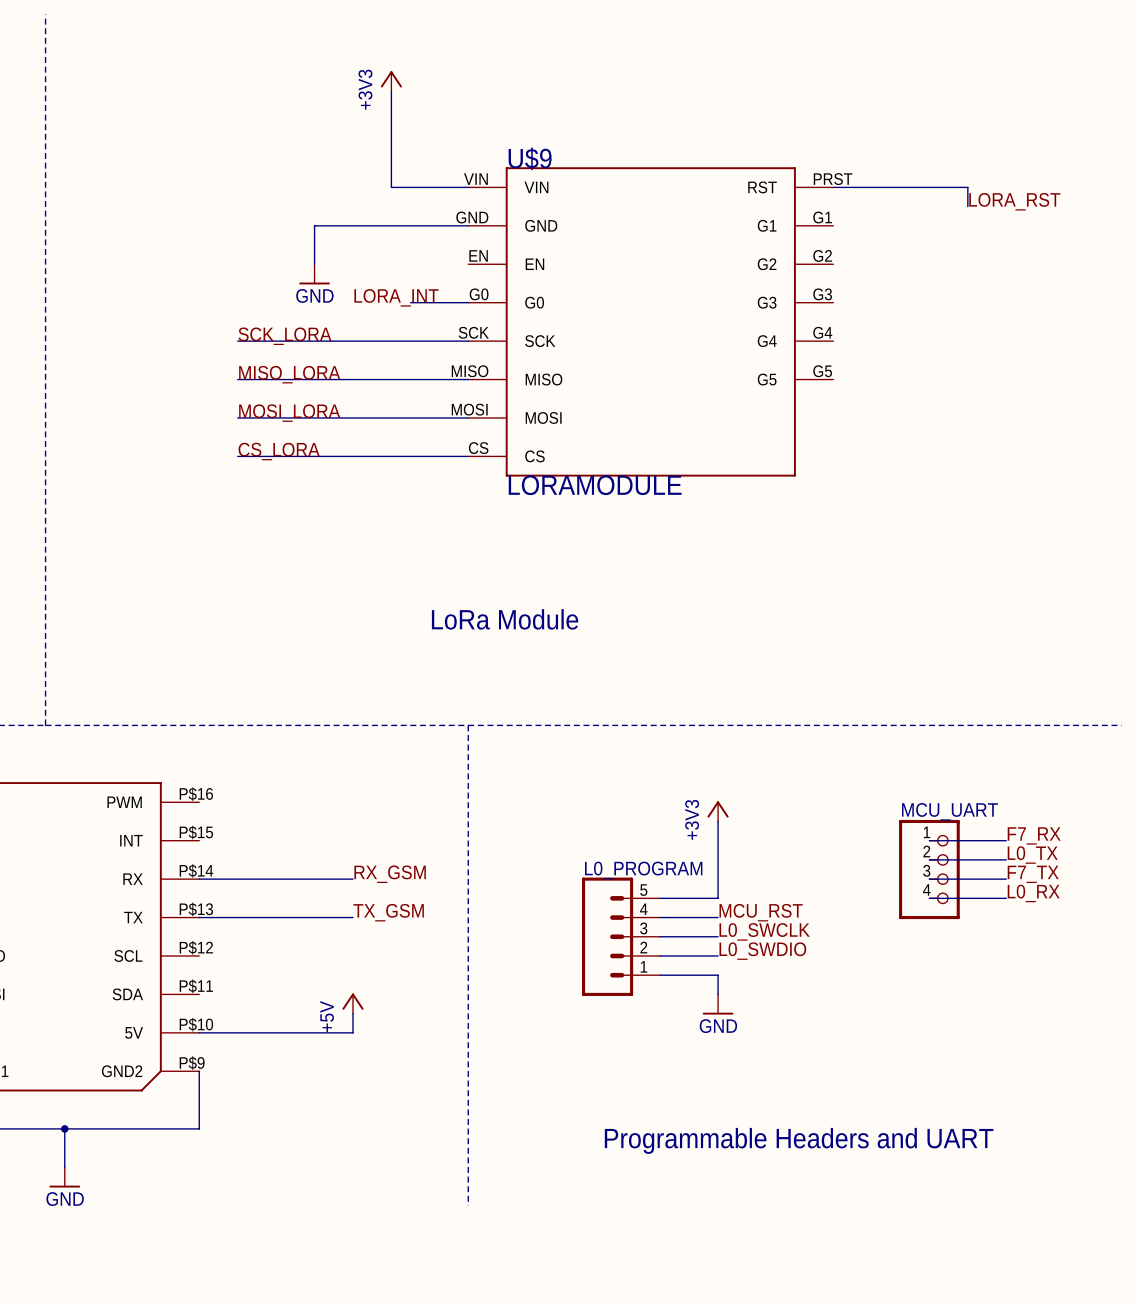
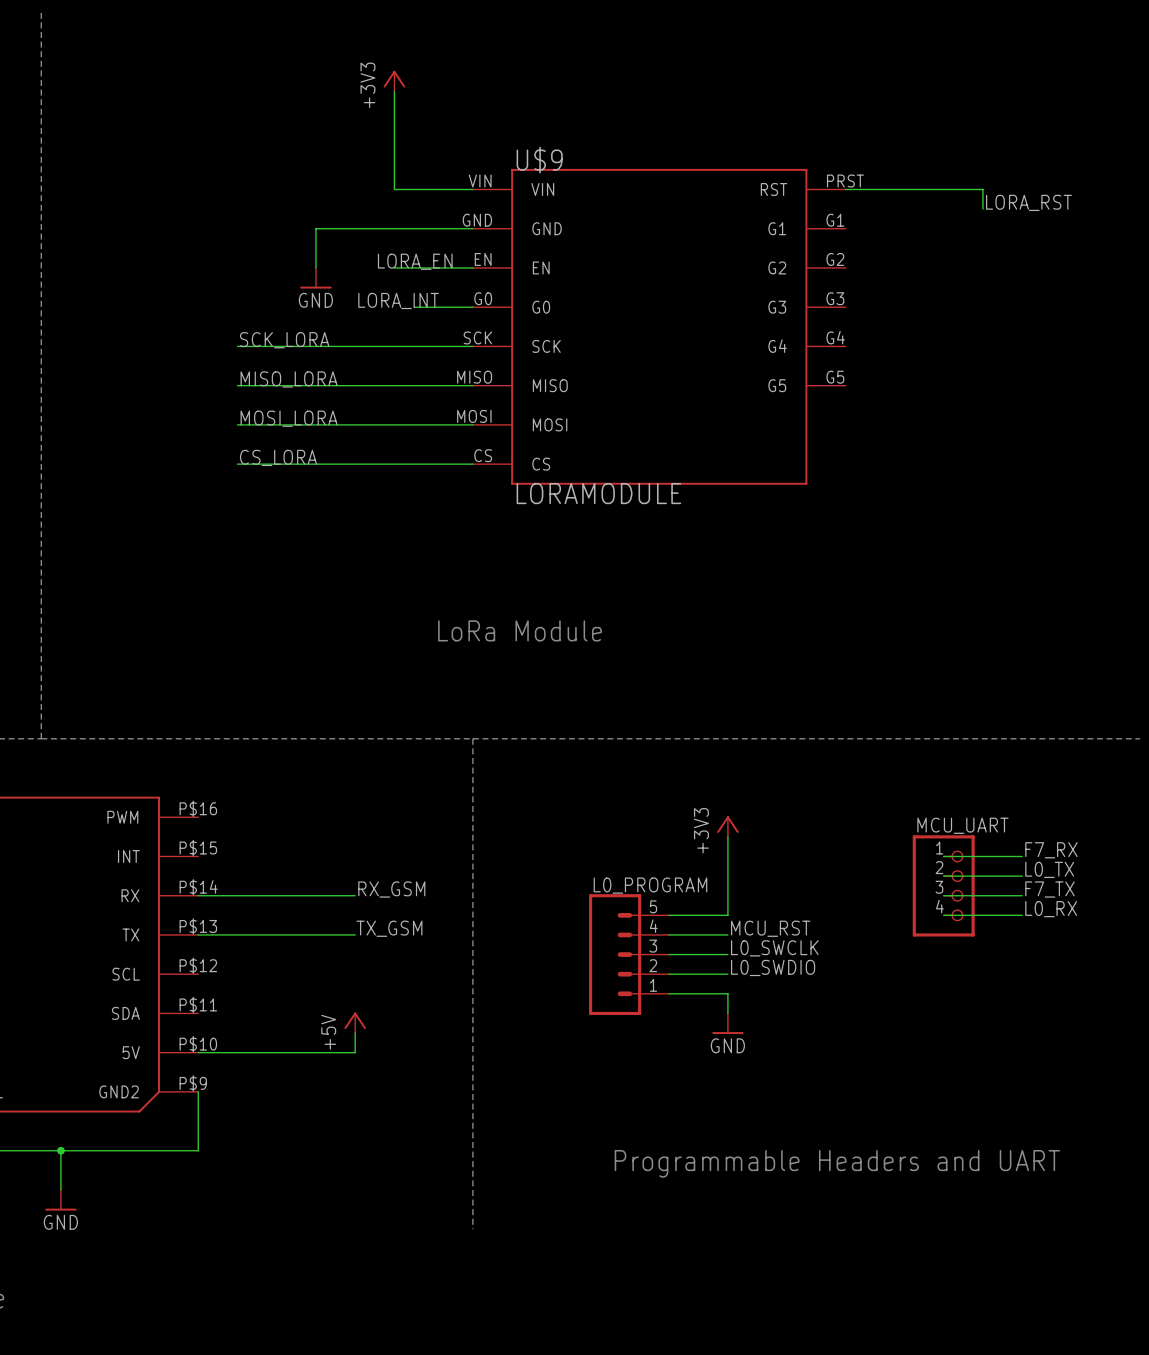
label: none -> LORA_EN (415, 261)
wire: none -> (394, 267) (472, 267)

